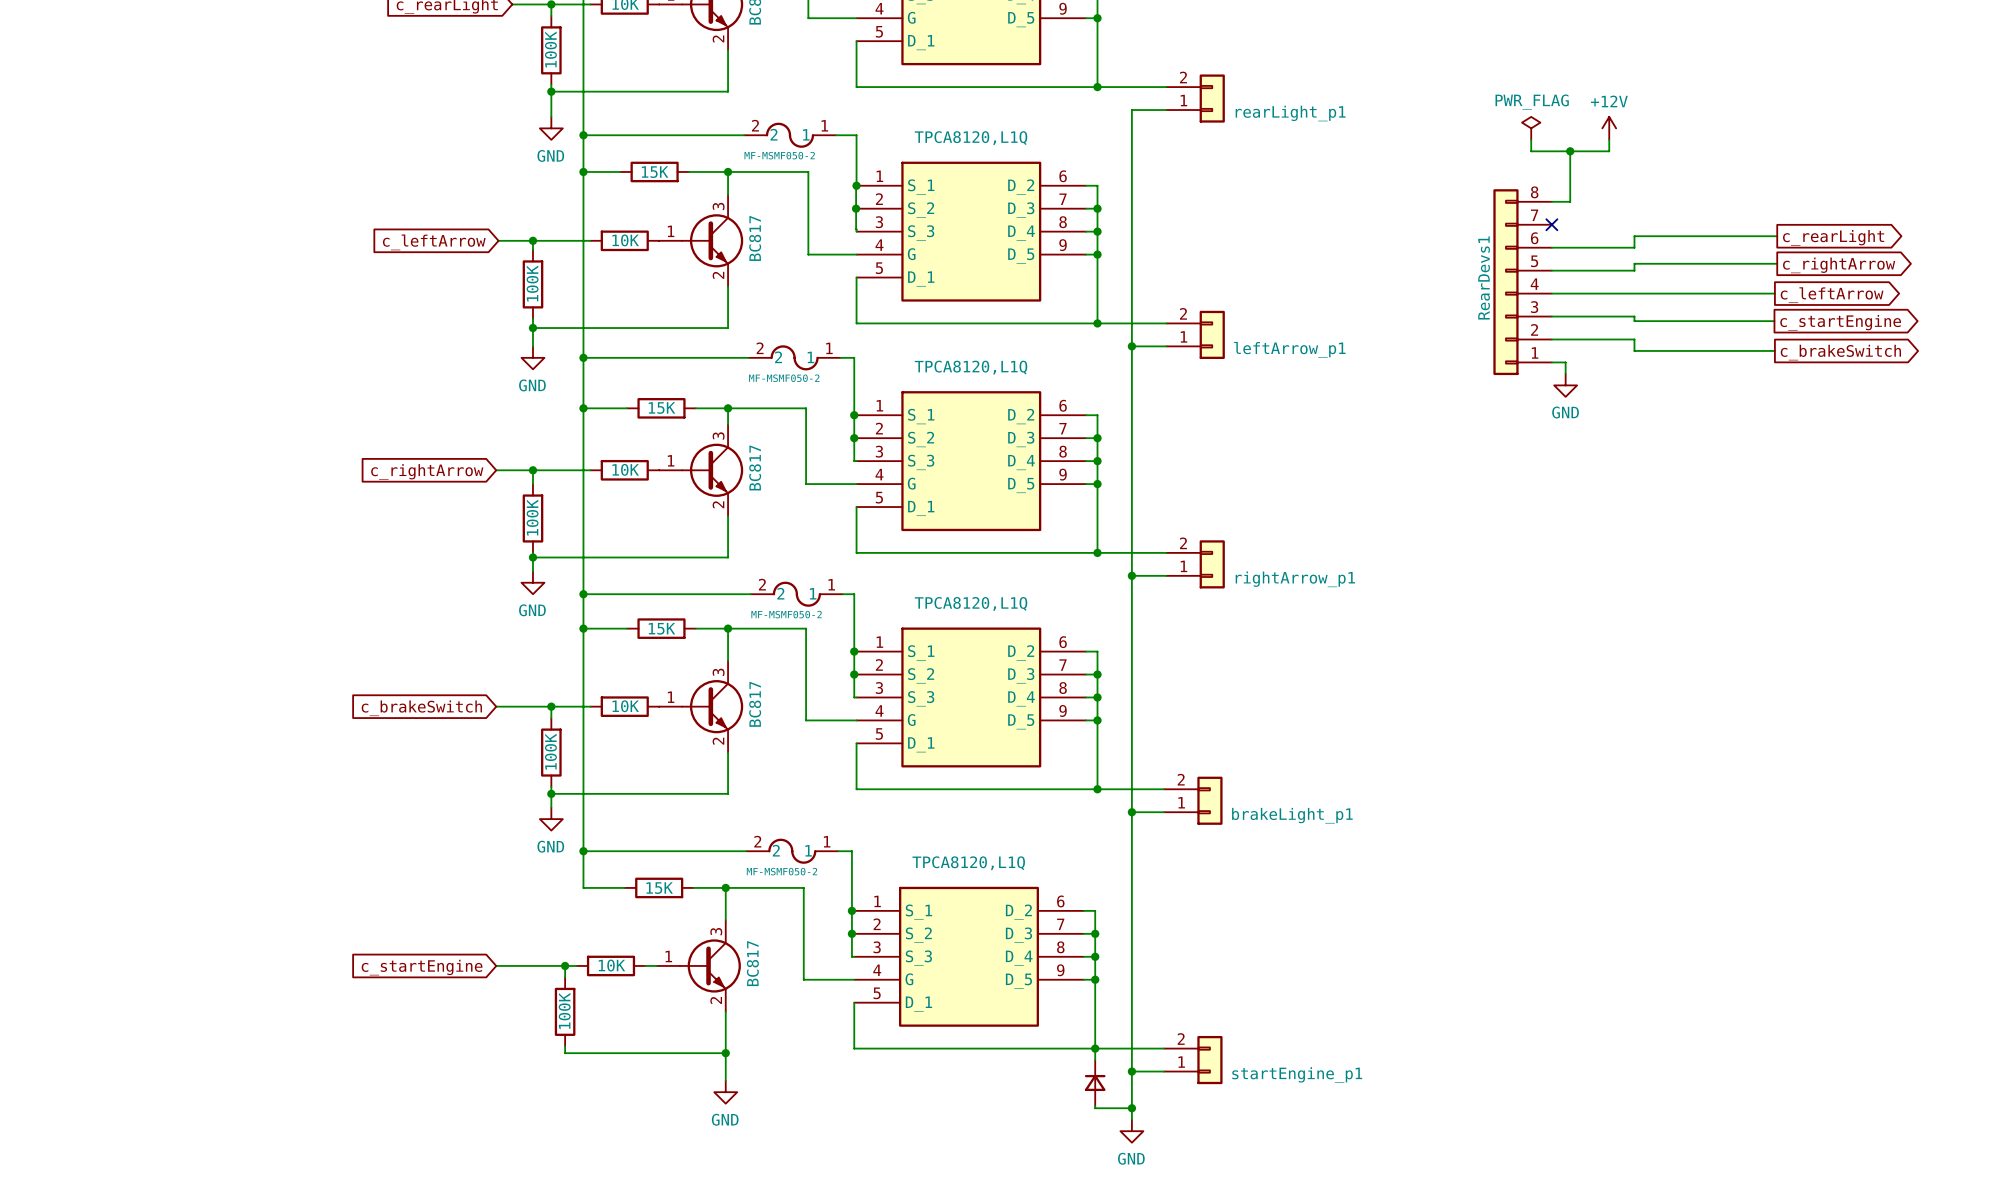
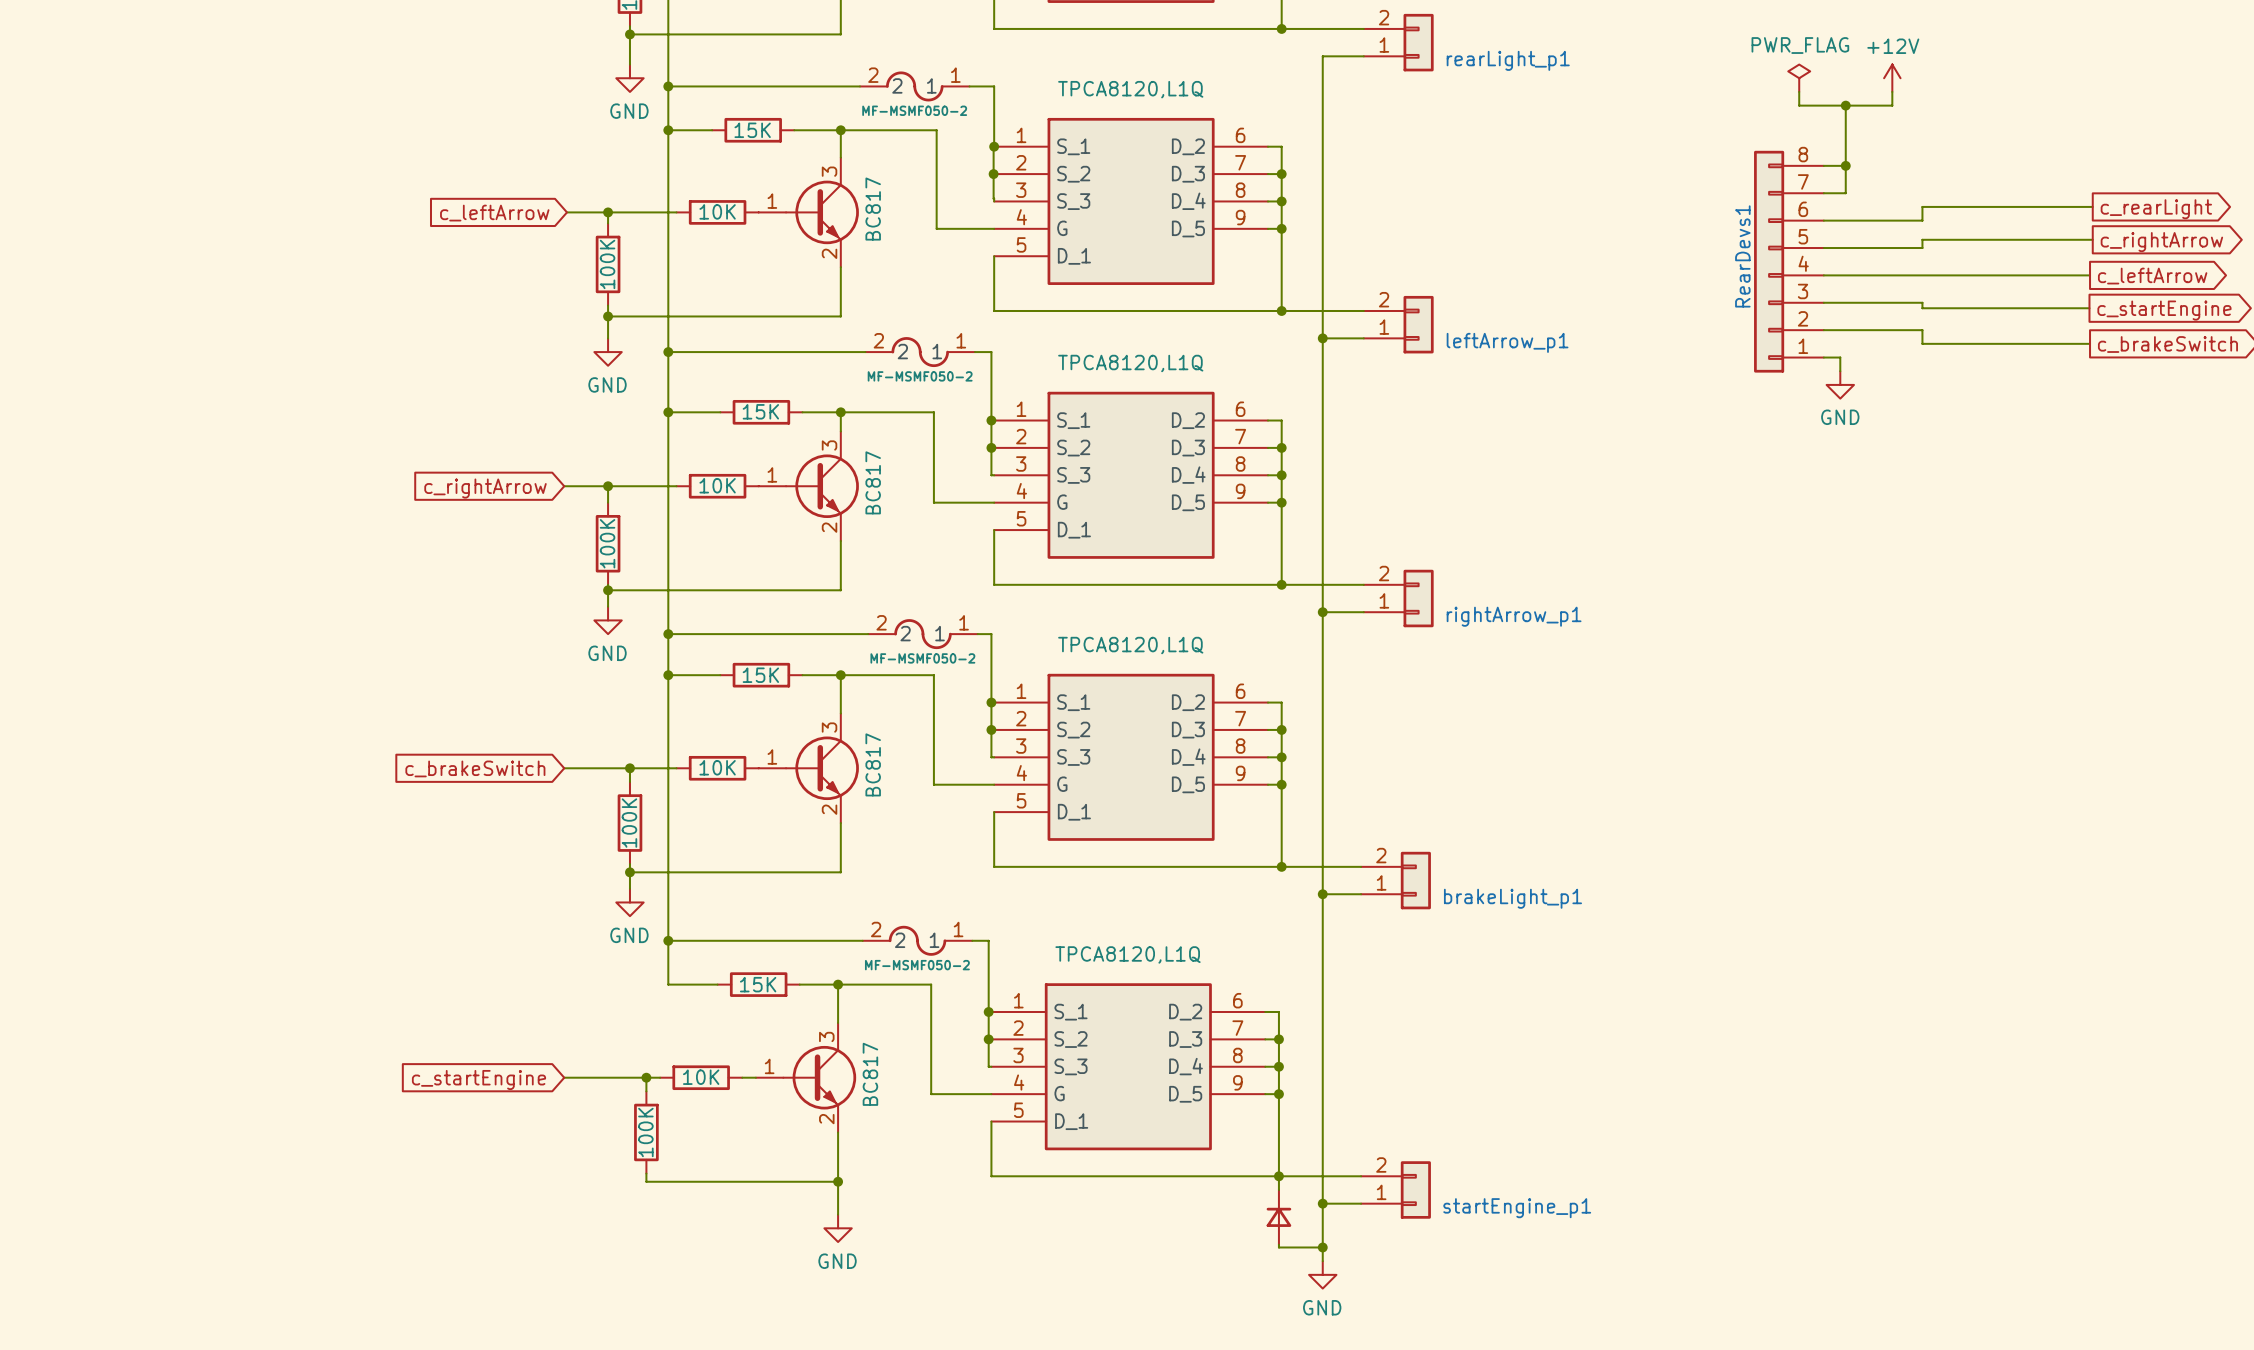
wire: none -> (1845, 165) (1845, 193) (1823, 193)
junction: none -> (1845, 165)
no-connect mark: (1551, 224) -> none

